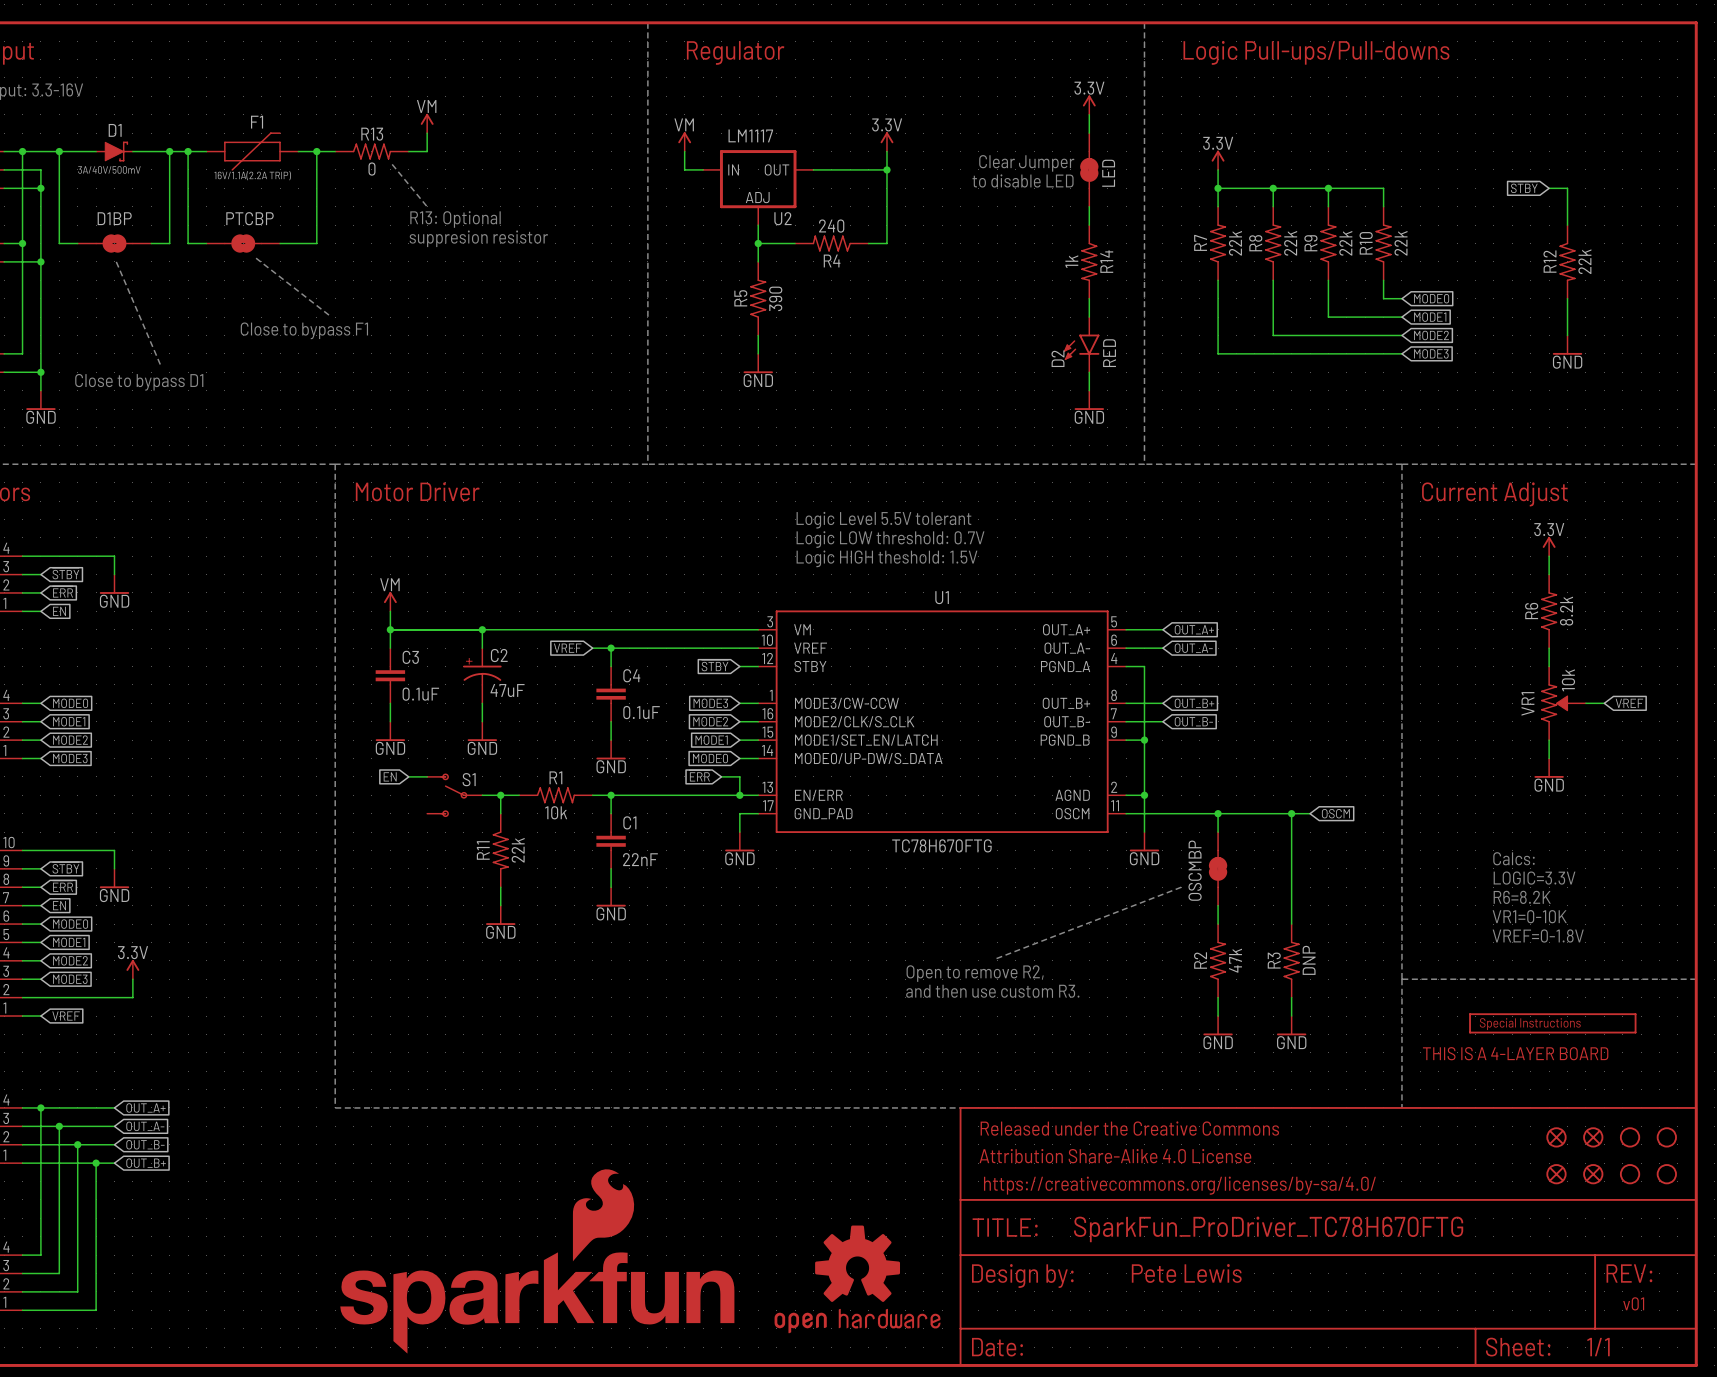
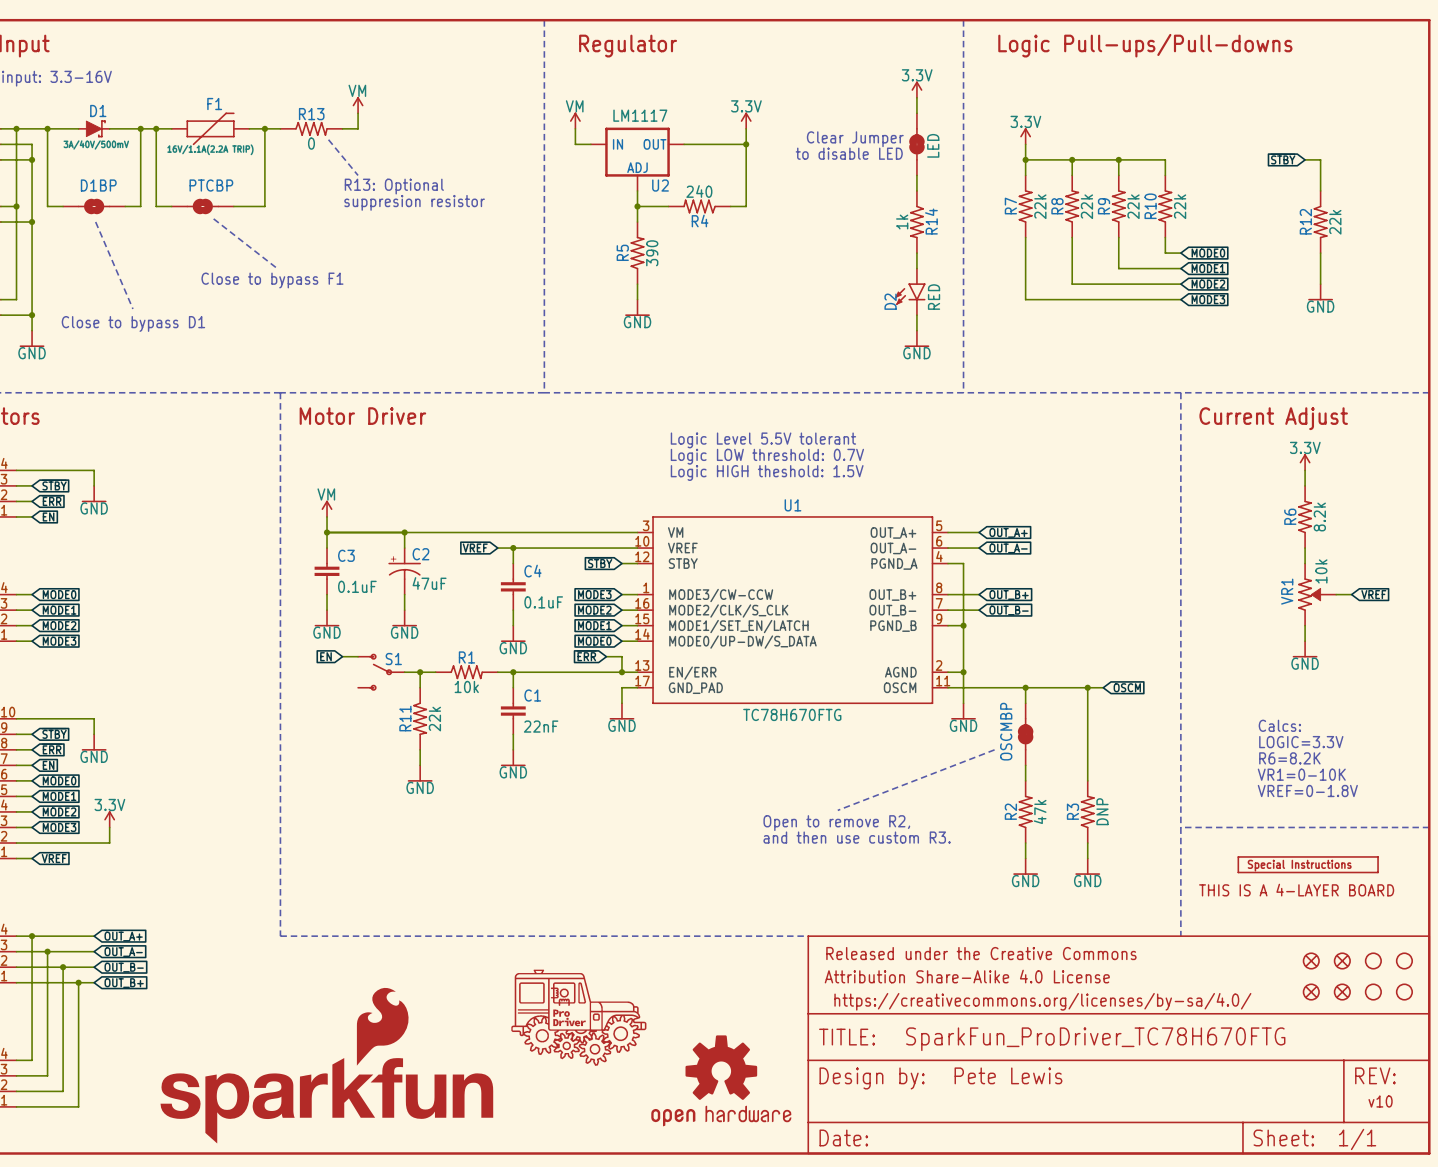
part: none -> (578, 1017)
part position: (537, 1261) -> (326, 1065)
text: v01 (1633, 1303) -> v10 (1380, 1101)

